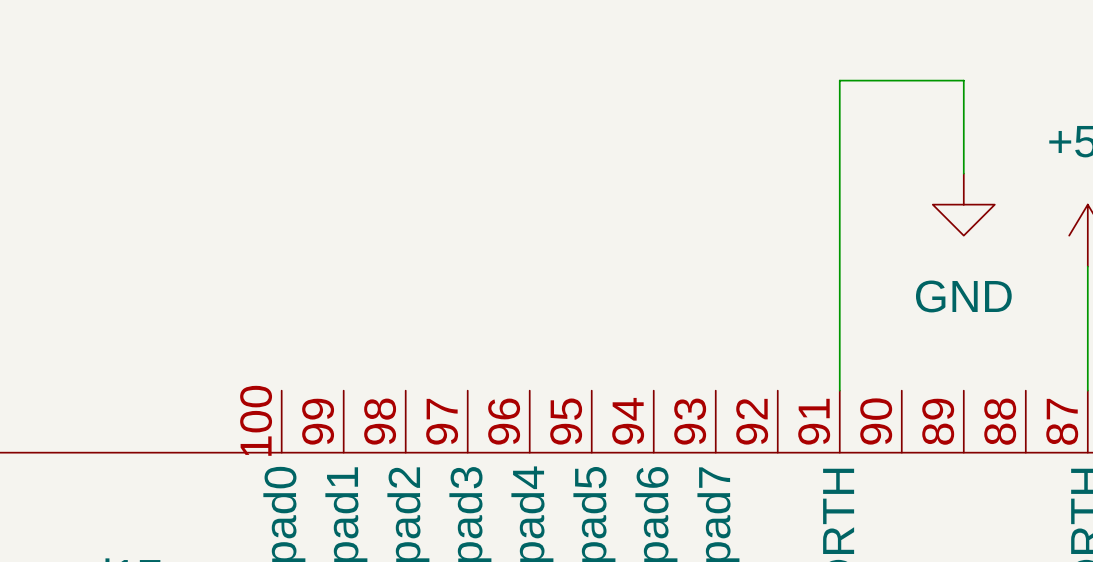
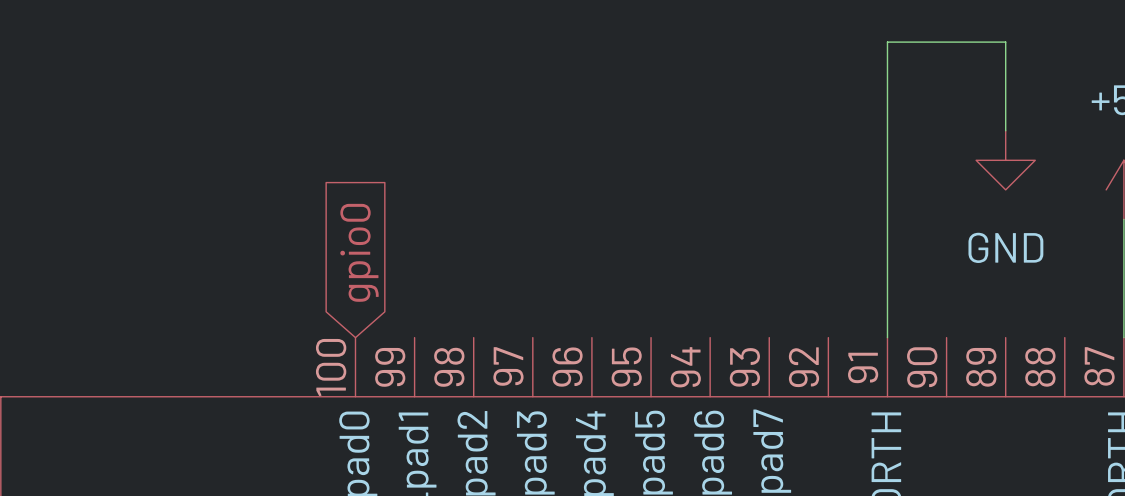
global label: none -> gpio0 (359, 252)

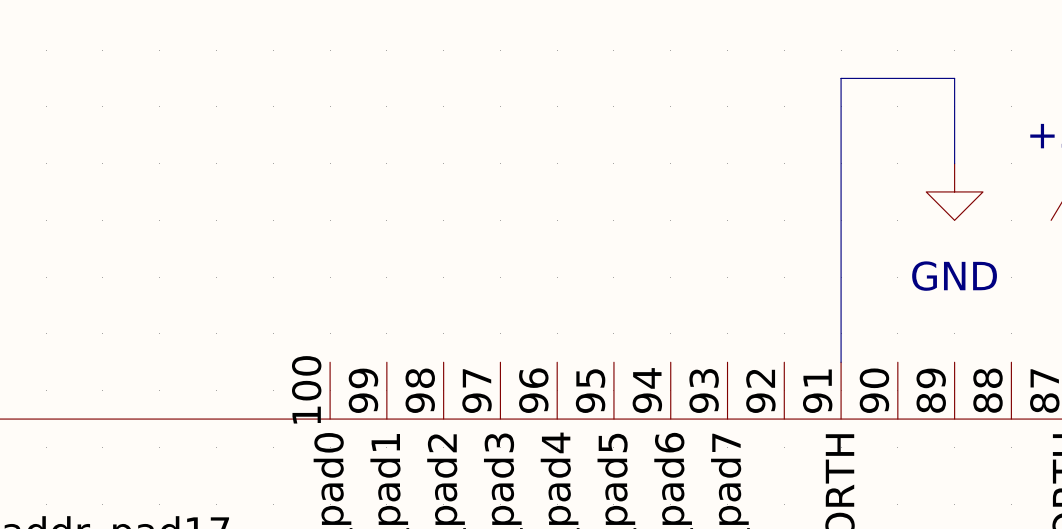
global label: gpio0 (359, 252) -> none

